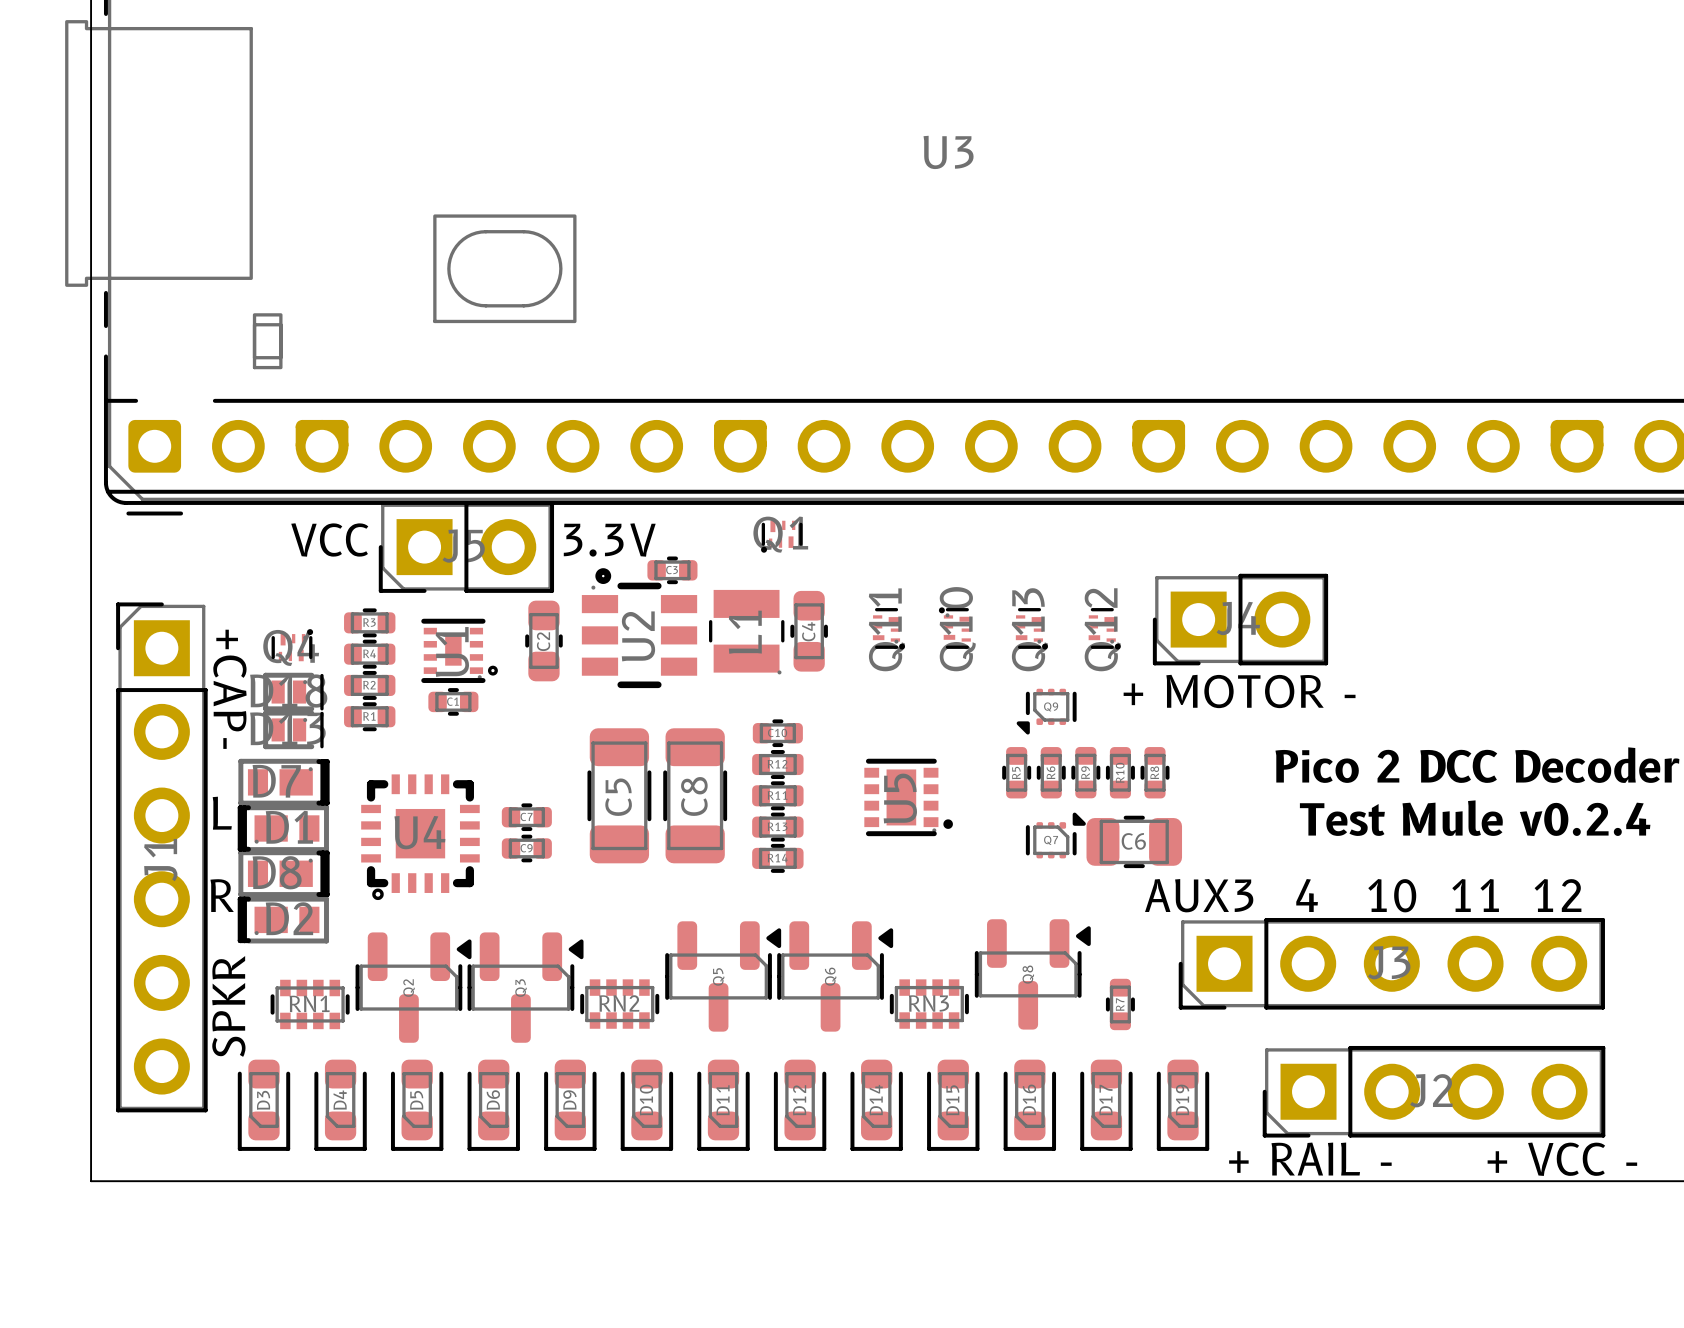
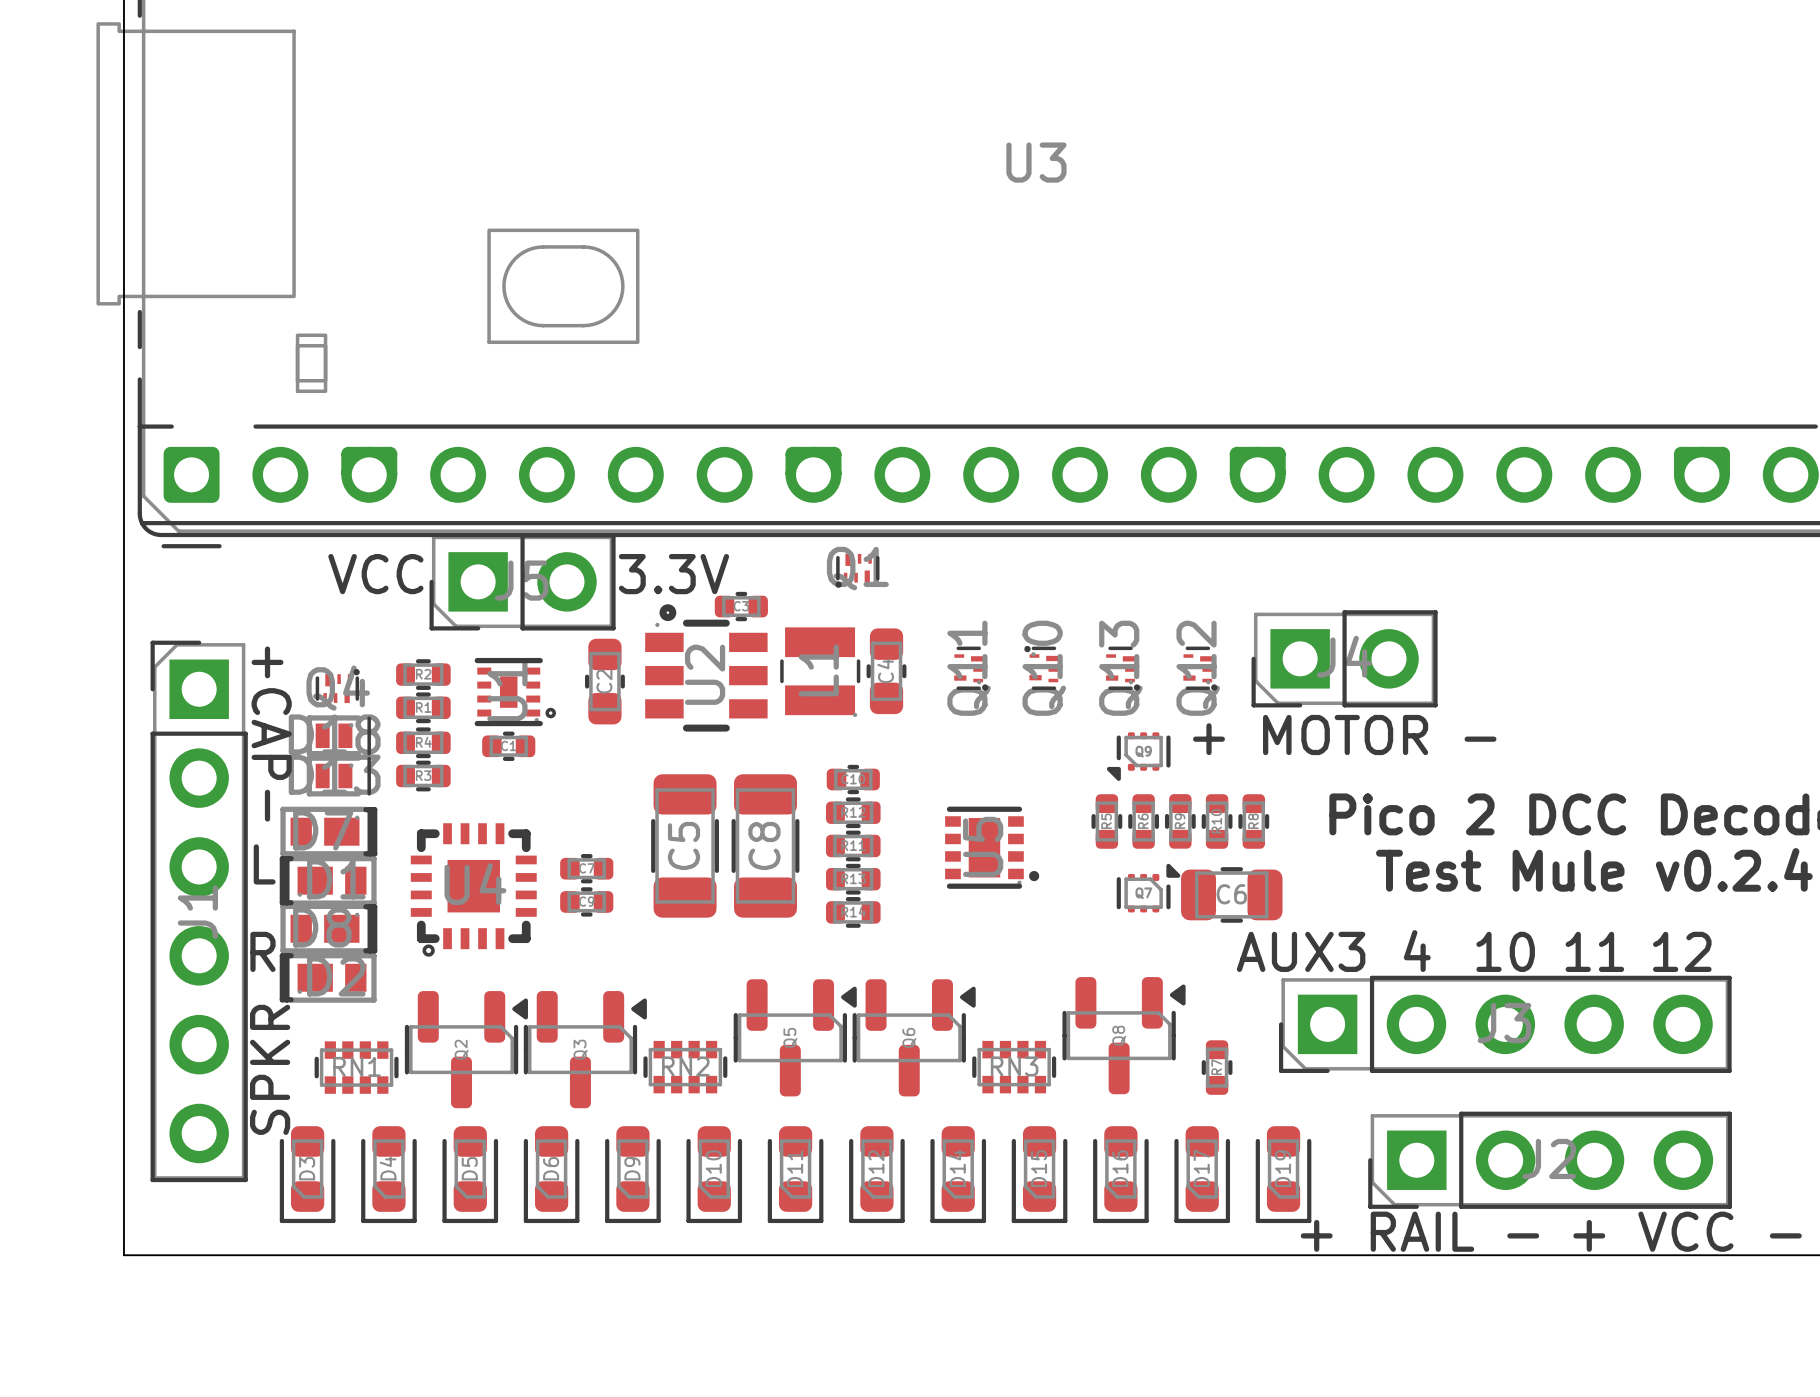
R3 position: (369, 622) -> (423, 776)
R4 position: (369, 654) -> (423, 742)
R2 position: (369, 685) -> (423, 674)
R1 position: (369, 716) -> (423, 707)

